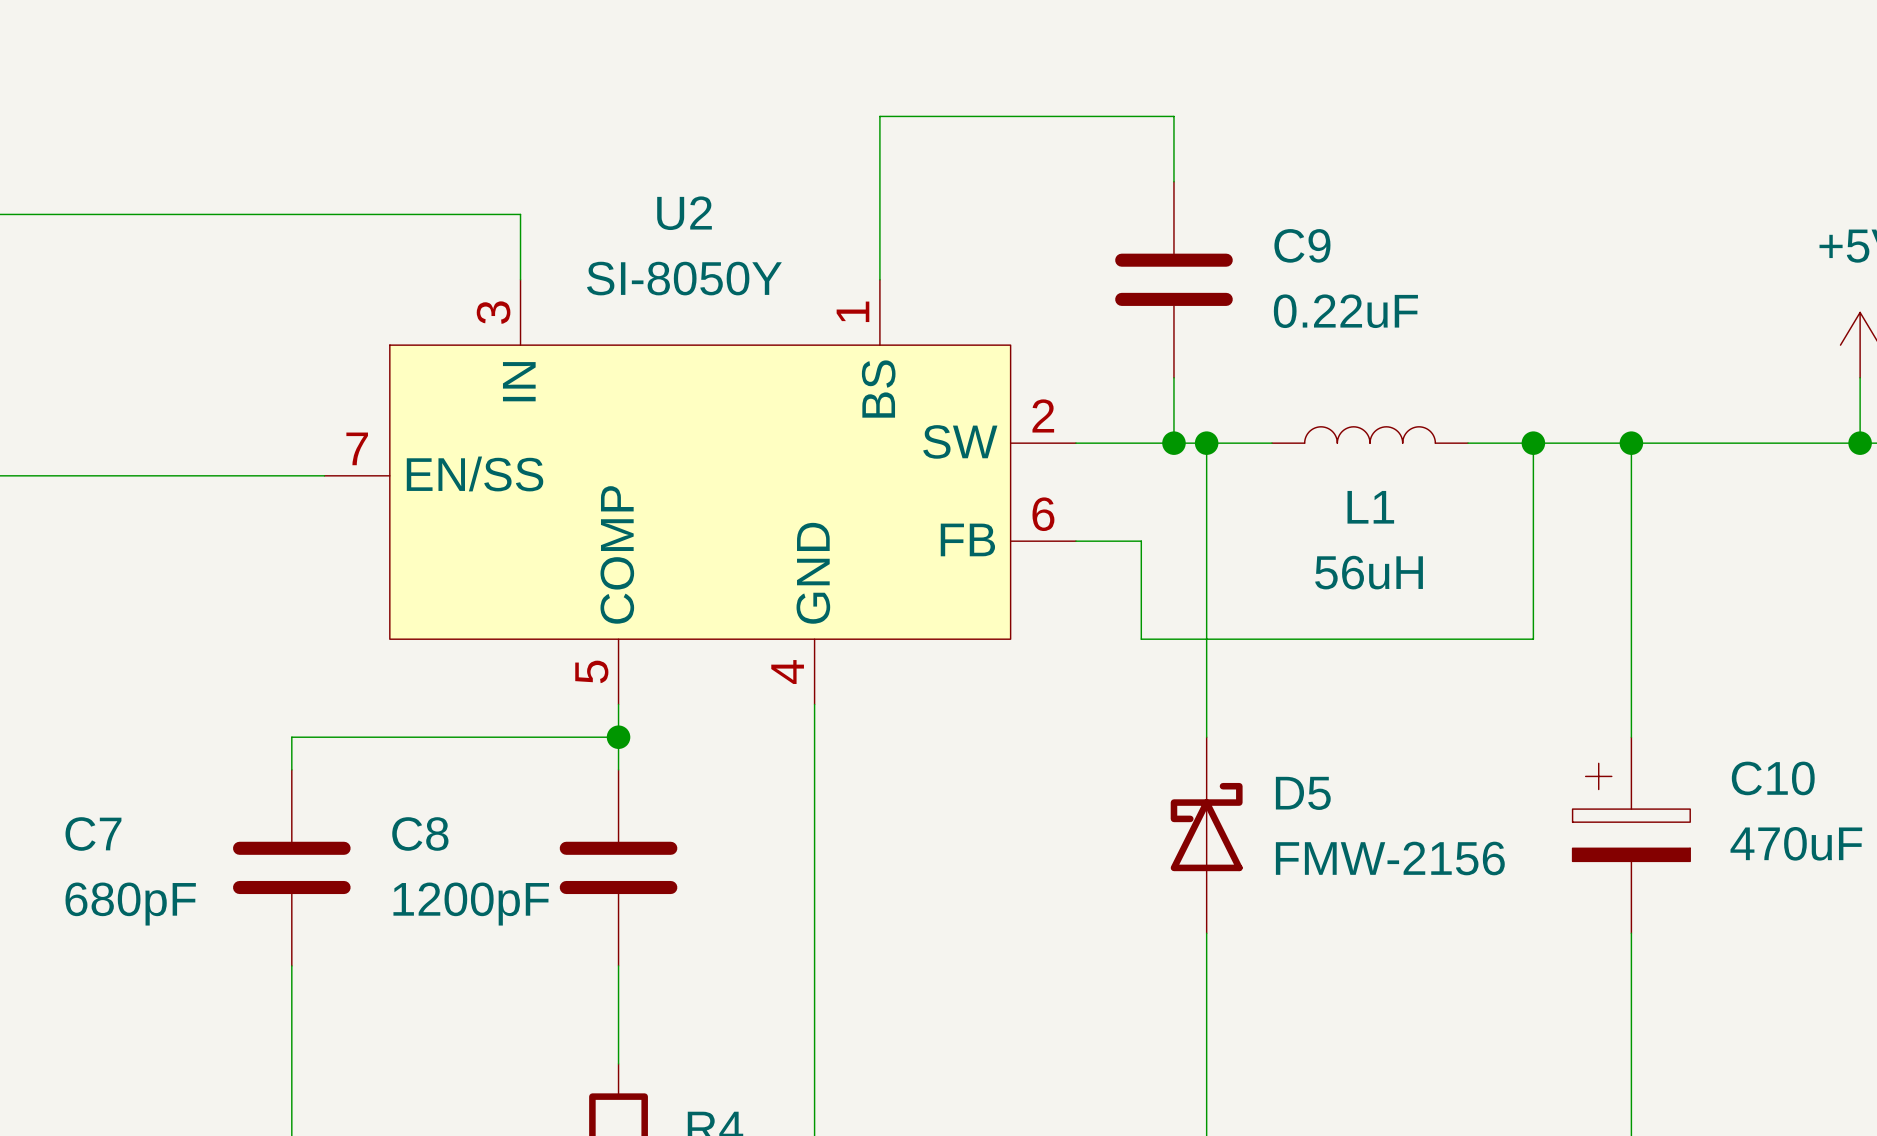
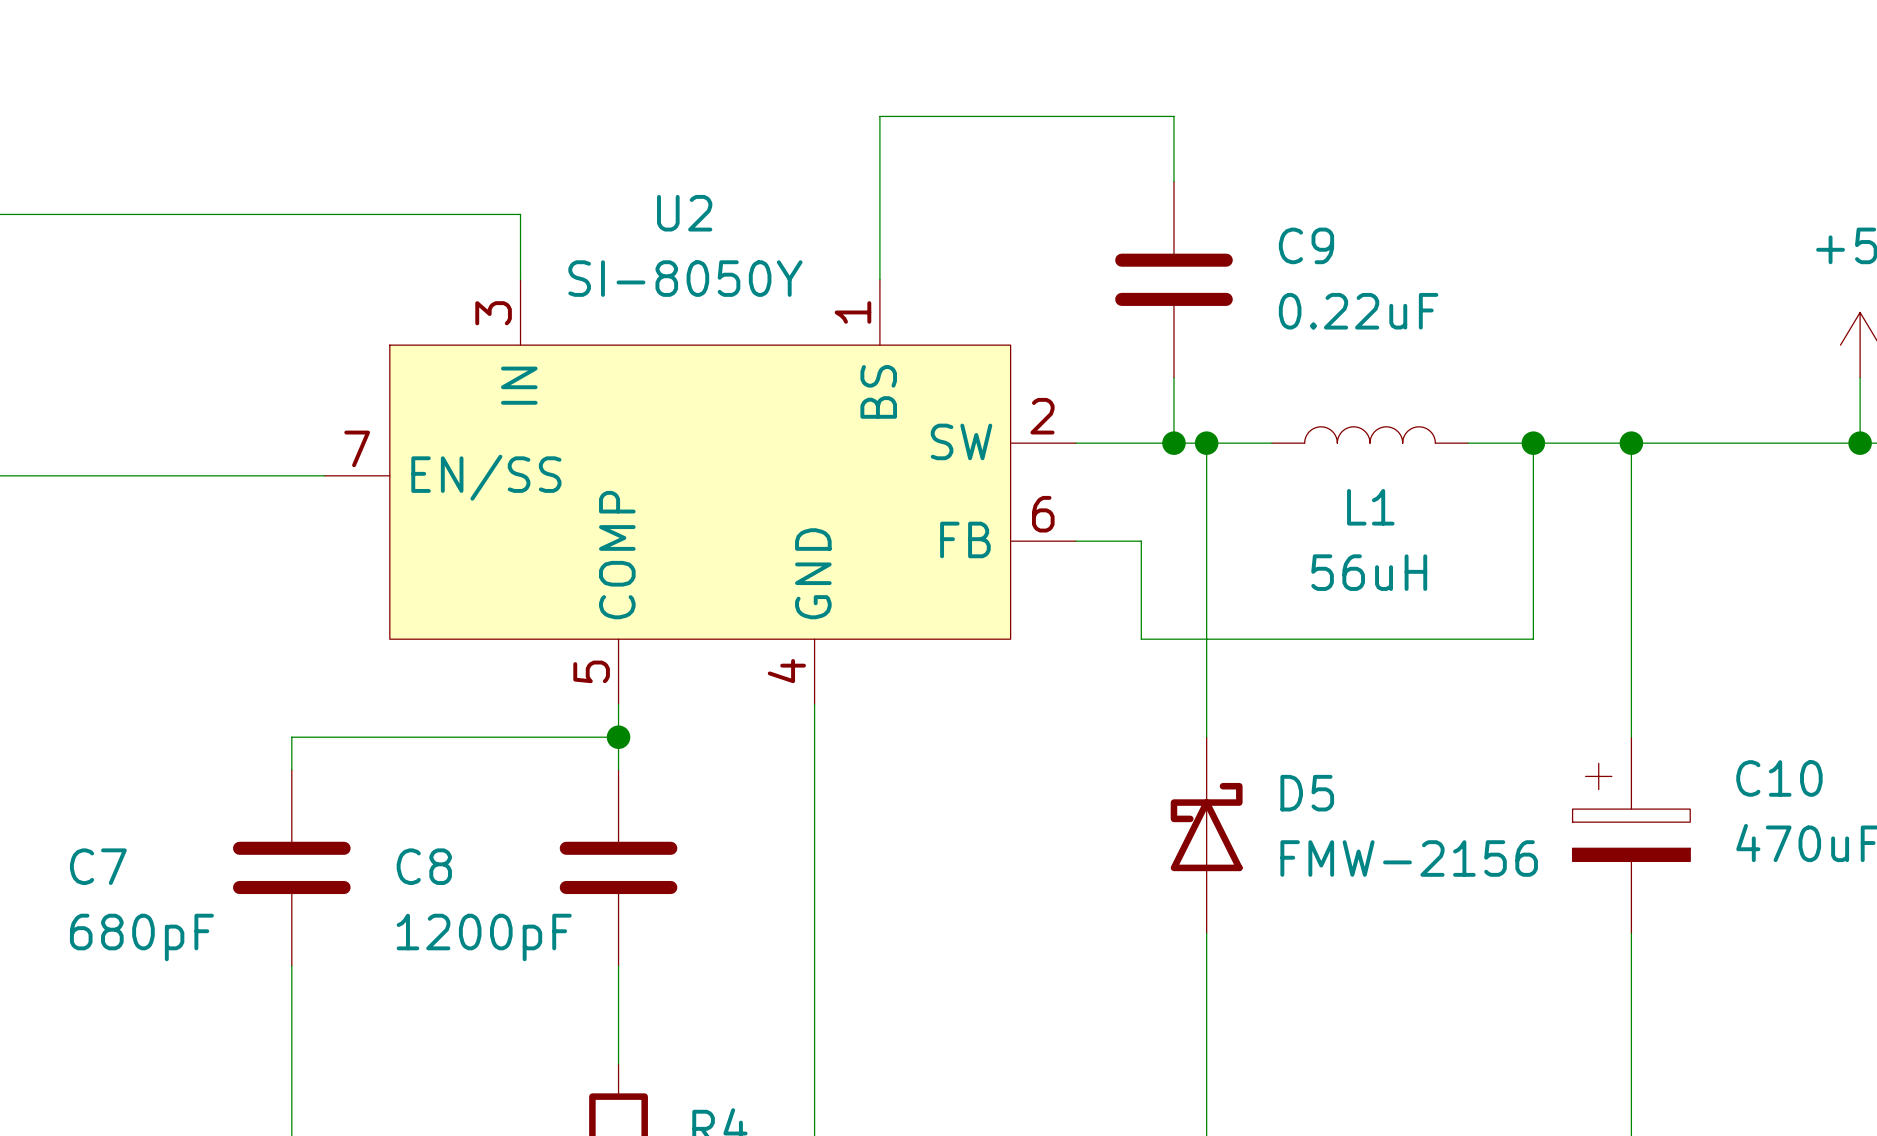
C7 name position: C7 (93, 833) -> C7 (98, 866)
C8 name position: C8 (420, 833) -> C8 (424, 866)
C7 value position: 680pF (130, 904) -> 680pF (141, 937)
C8 value position: 1200pF (471, 904) -> 1200pF (484, 937)

